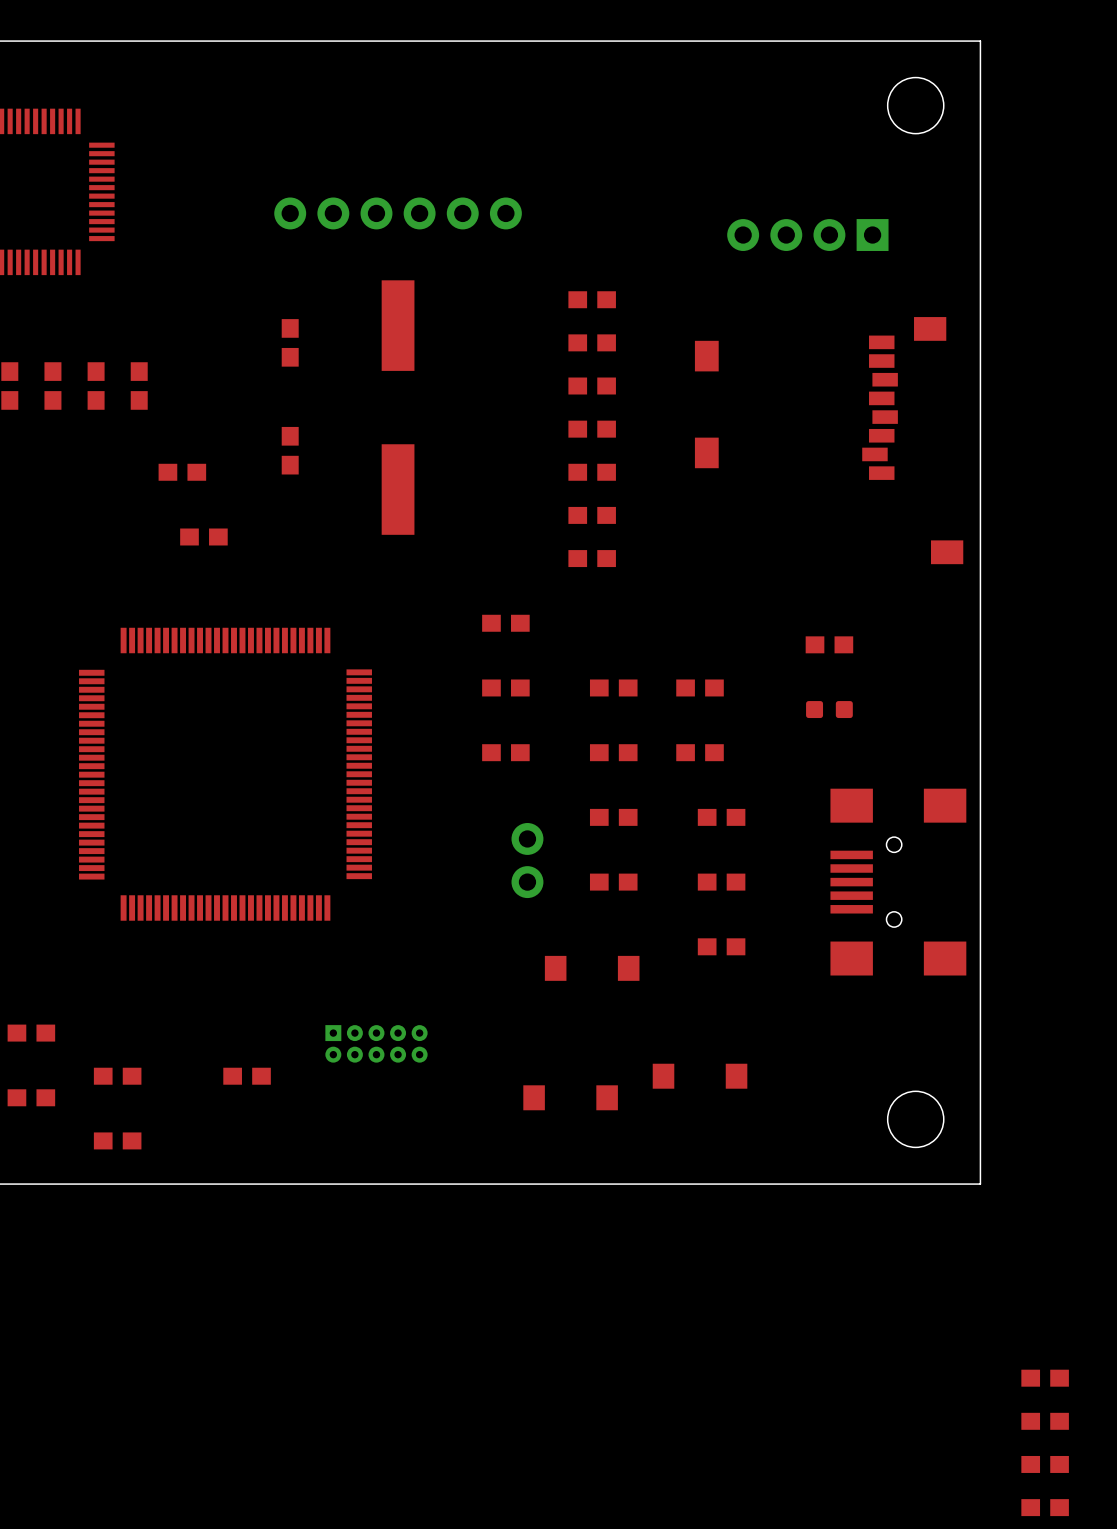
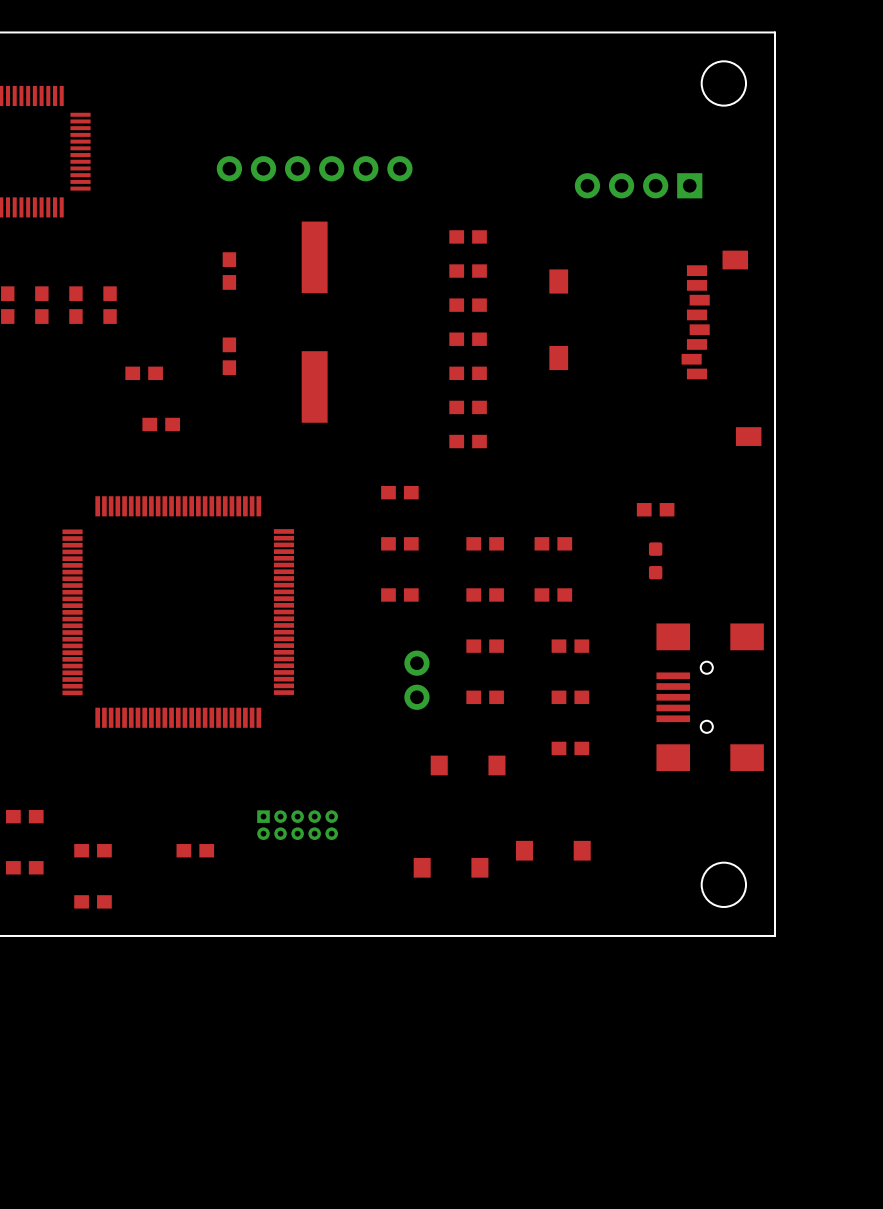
part rotation: 0° (829, 709) -> 90° clockwise (655, 560)
part: (1045, 1378) -> none
part: (1045, 1421) -> none
part: (1045, 1464) -> none
part: (1045, 1507) -> none

